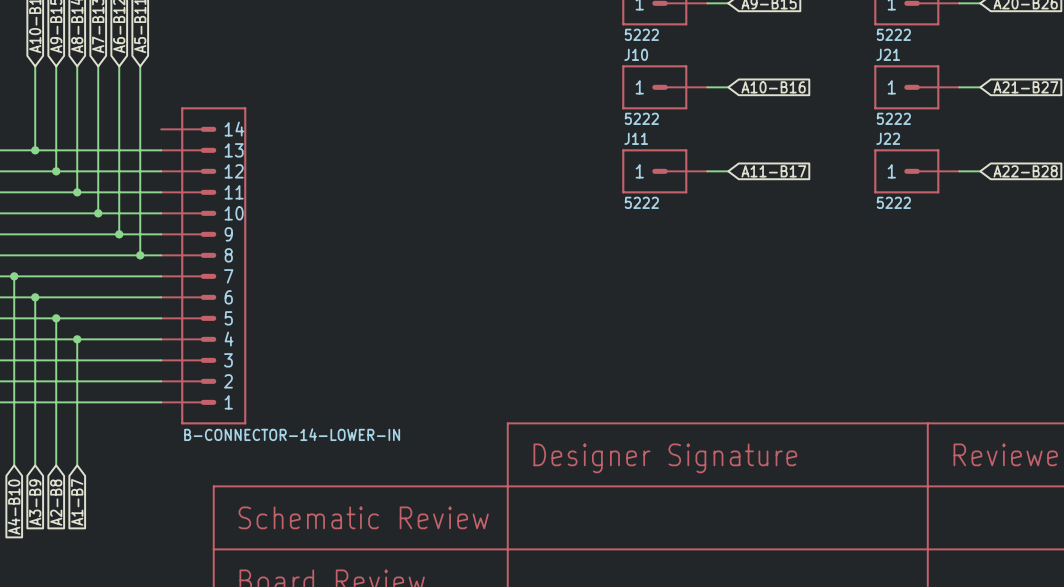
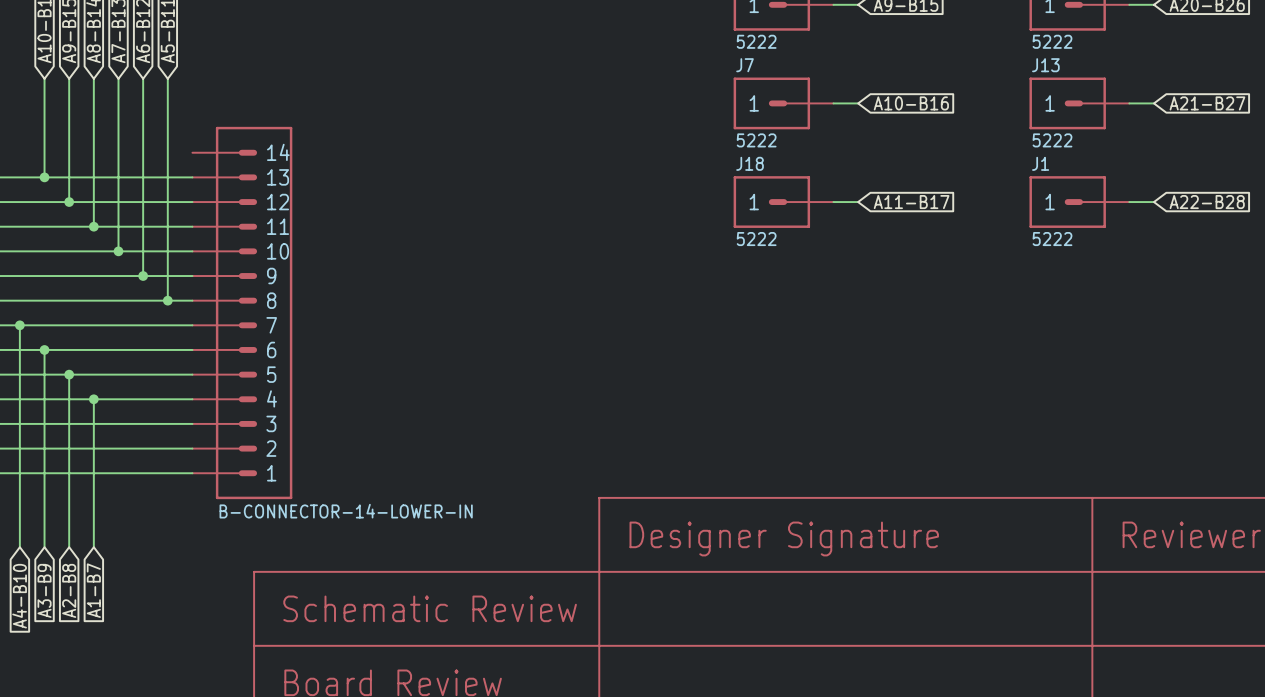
J10 name: J10 (636, 54) -> J7 (745, 65)
J21 name: J21 (888, 54) -> J13 (1045, 65)
J11 name: J11 (636, 138) -> J18 (750, 163)
J22 name: J22 (888, 138) -> J1 (1040, 163)

